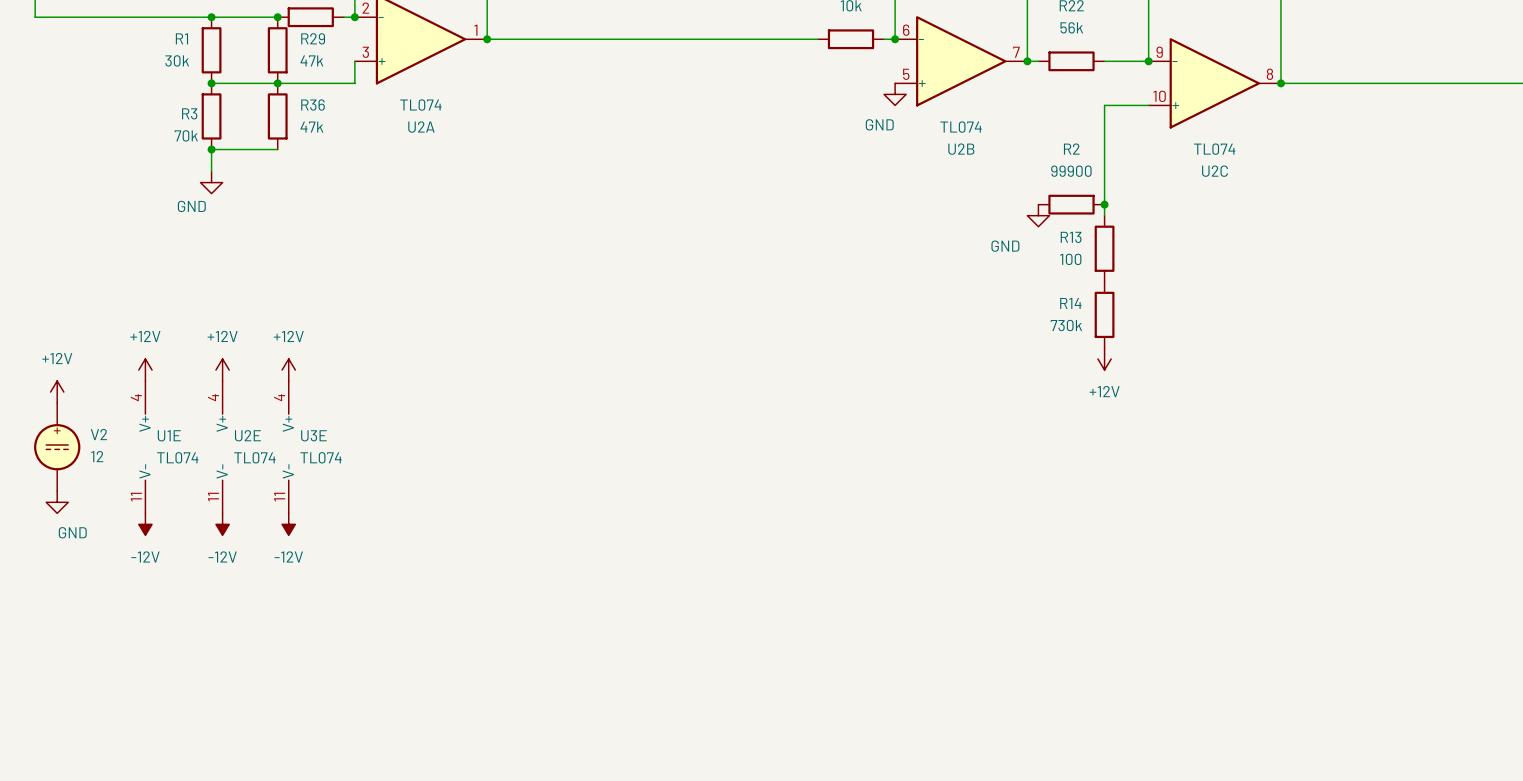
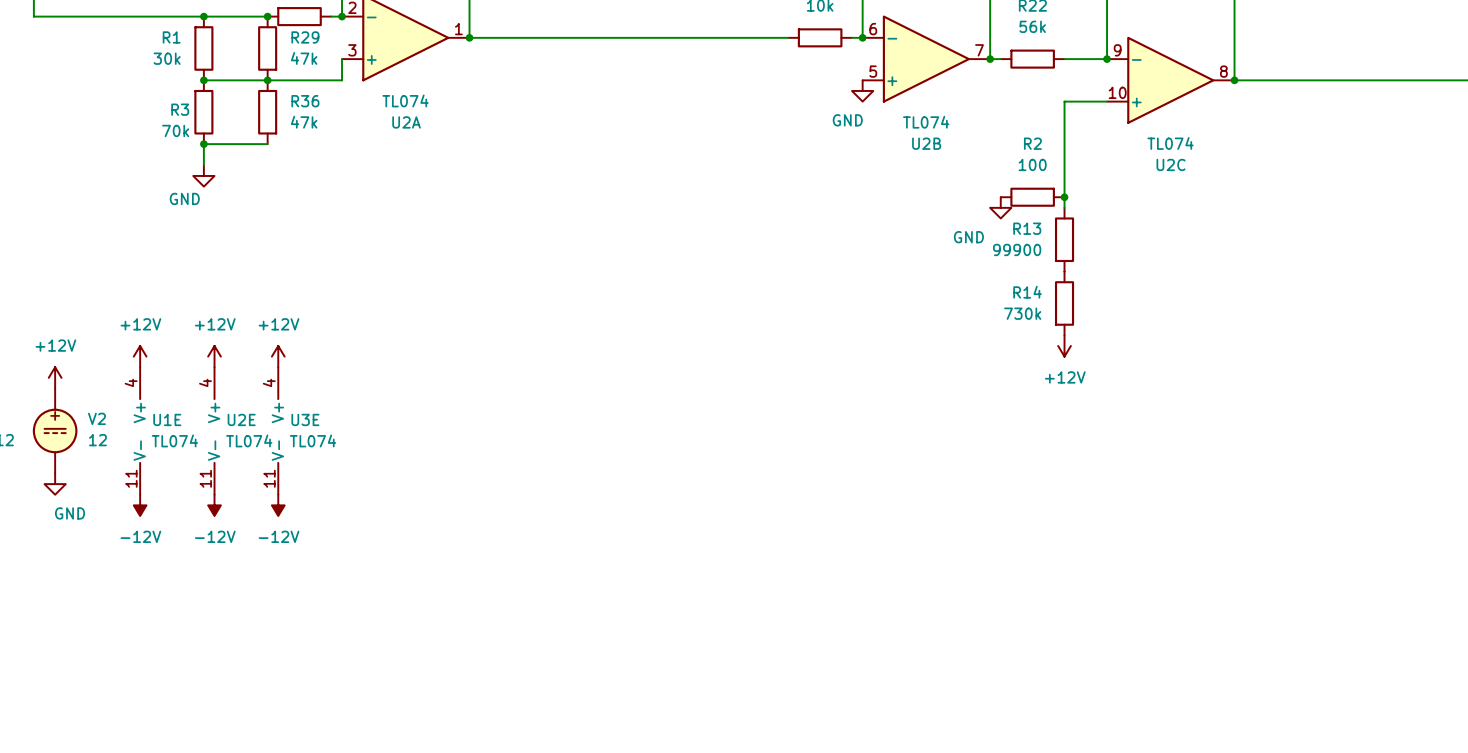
R2 value: 99900 (1071, 171) -> 100 (1032, 164)
R13 value: 100 (1070, 259) -> 99900 (1017, 249)

